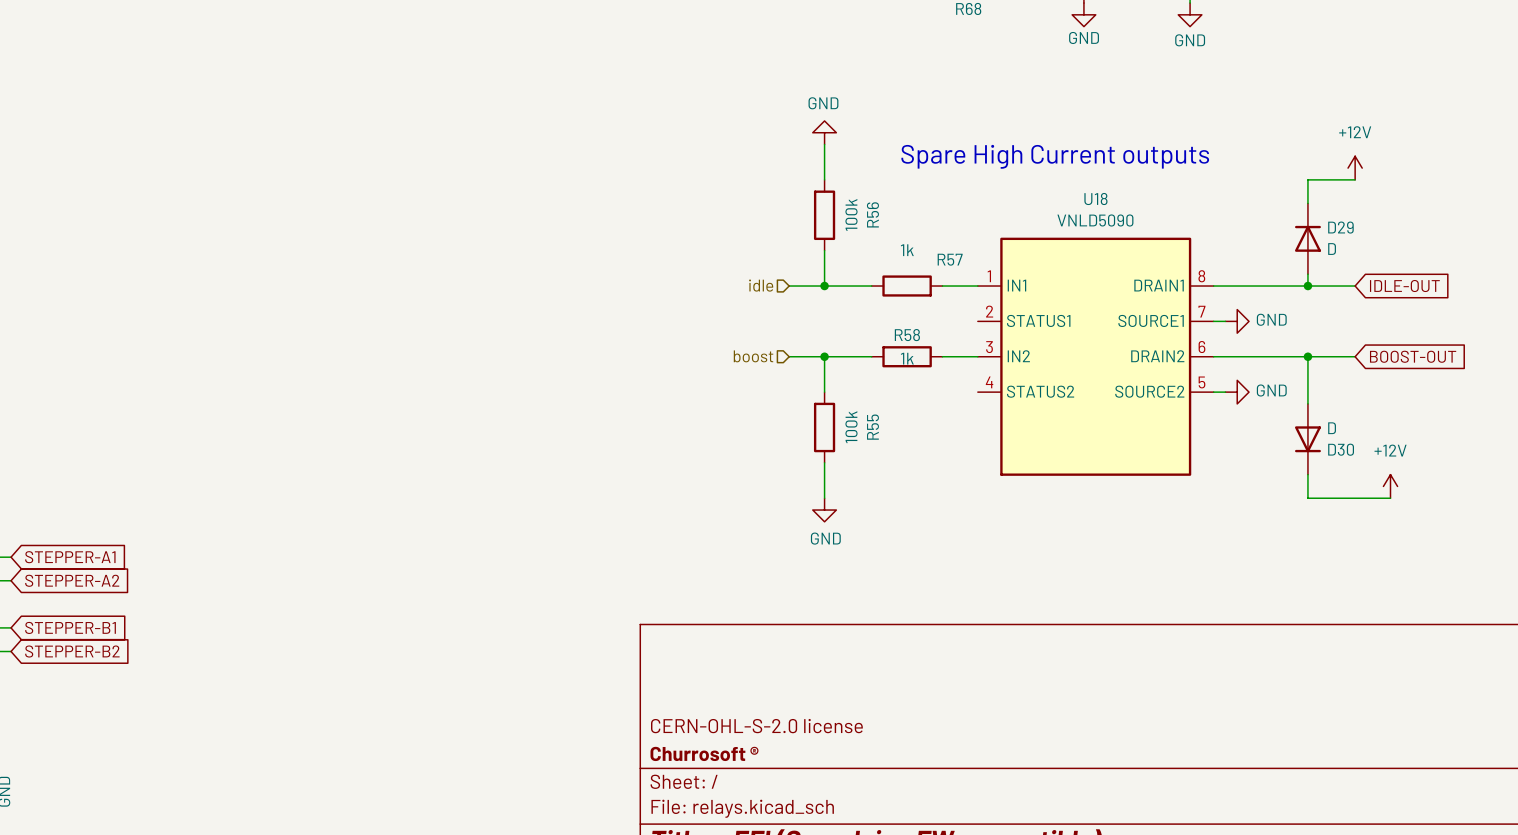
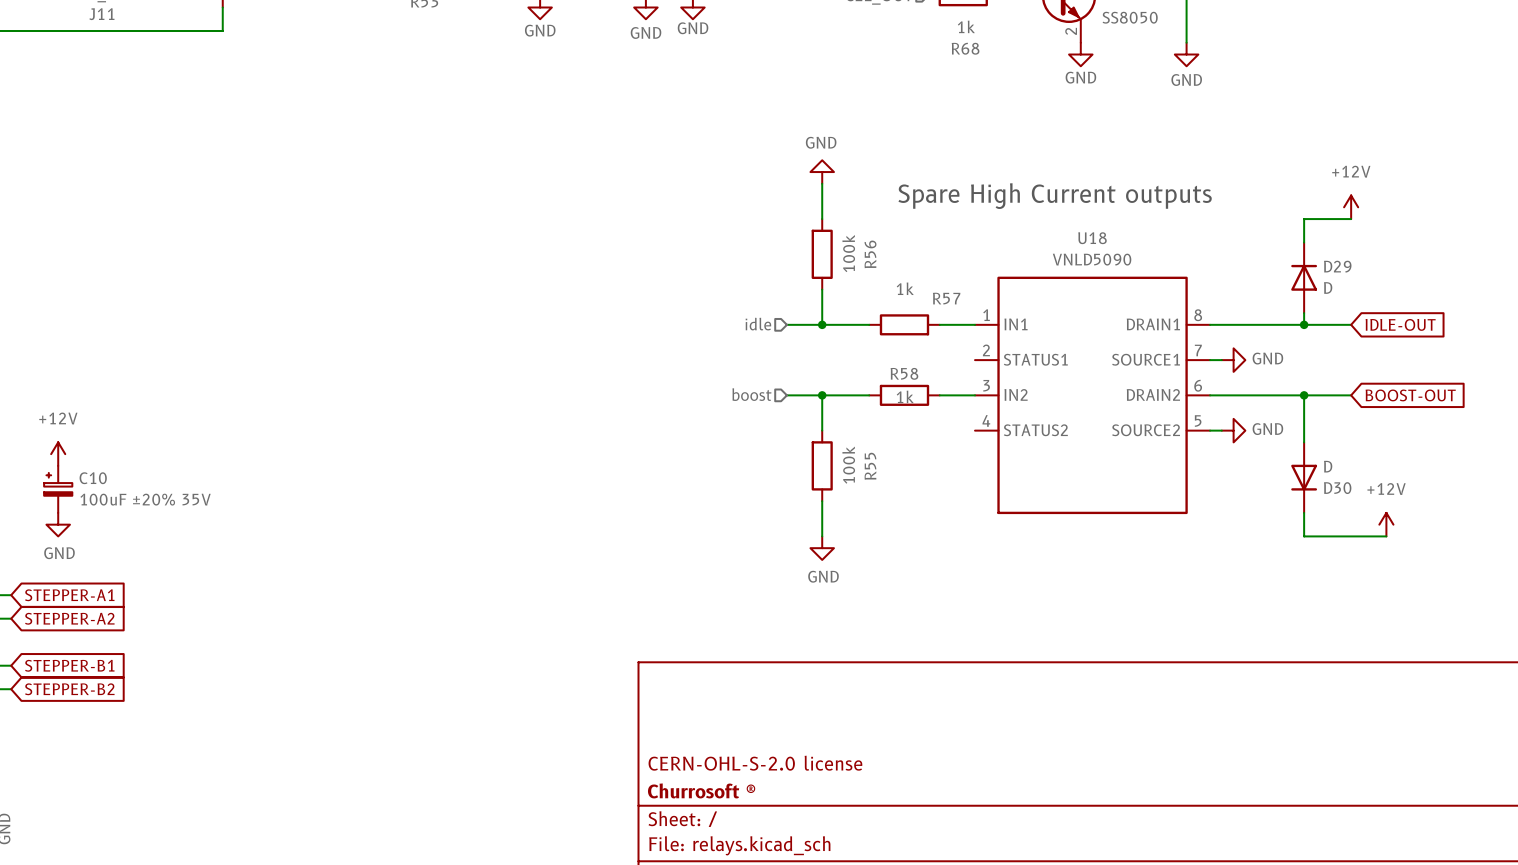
power symbol: none -> +12V (58, 454)
C10: none -> 100uF ±20% 35V (58, 489)
power symbol: none -> GND (58, 524)

